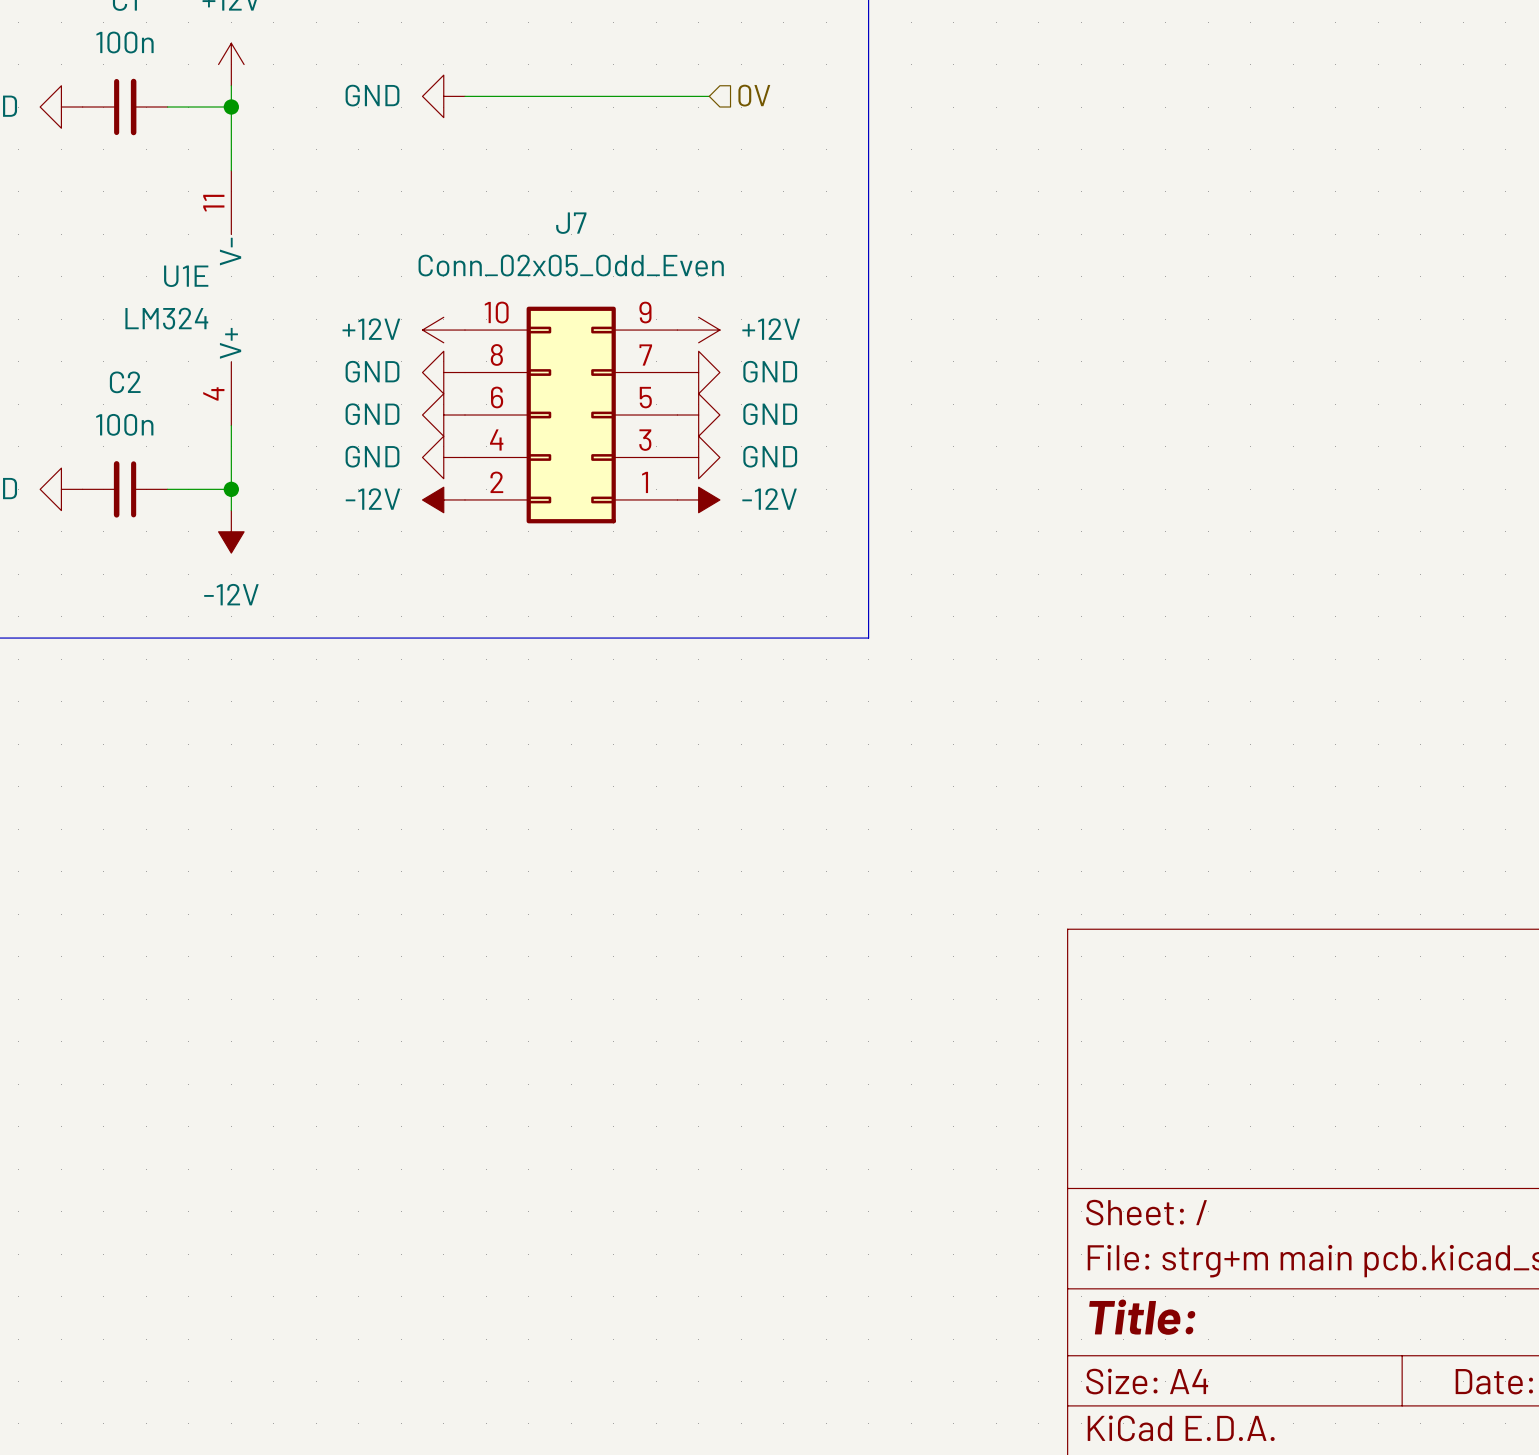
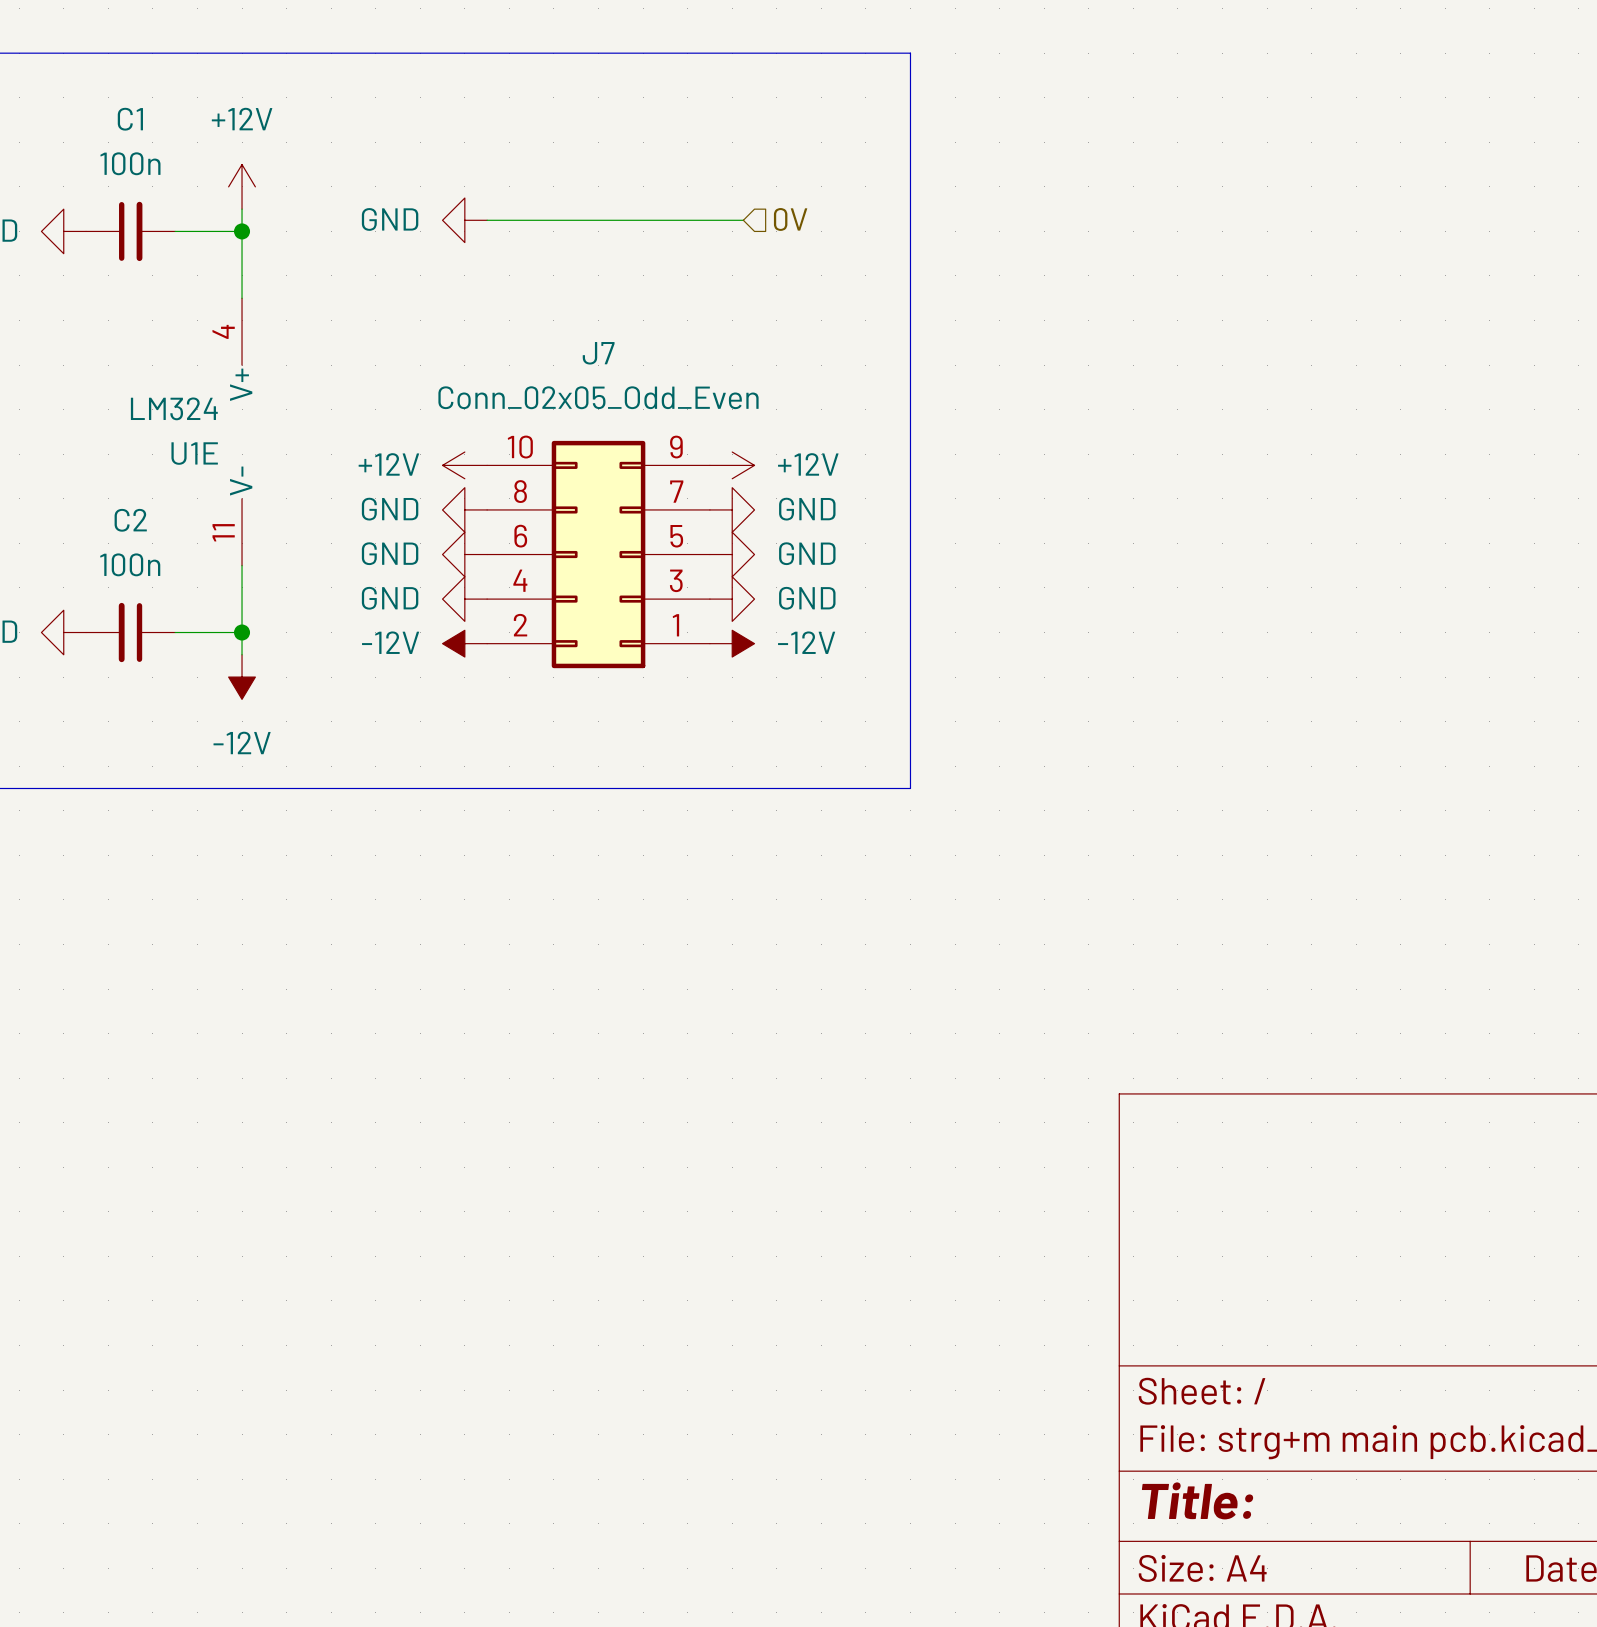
U1E name position: U1E (186, 276) -> U1E (194, 453)
U1E rotation: 0° (231, 298) -> 180° (242, 431)
U1E value position: LM324 (166, 318) -> LM324 (174, 408)

